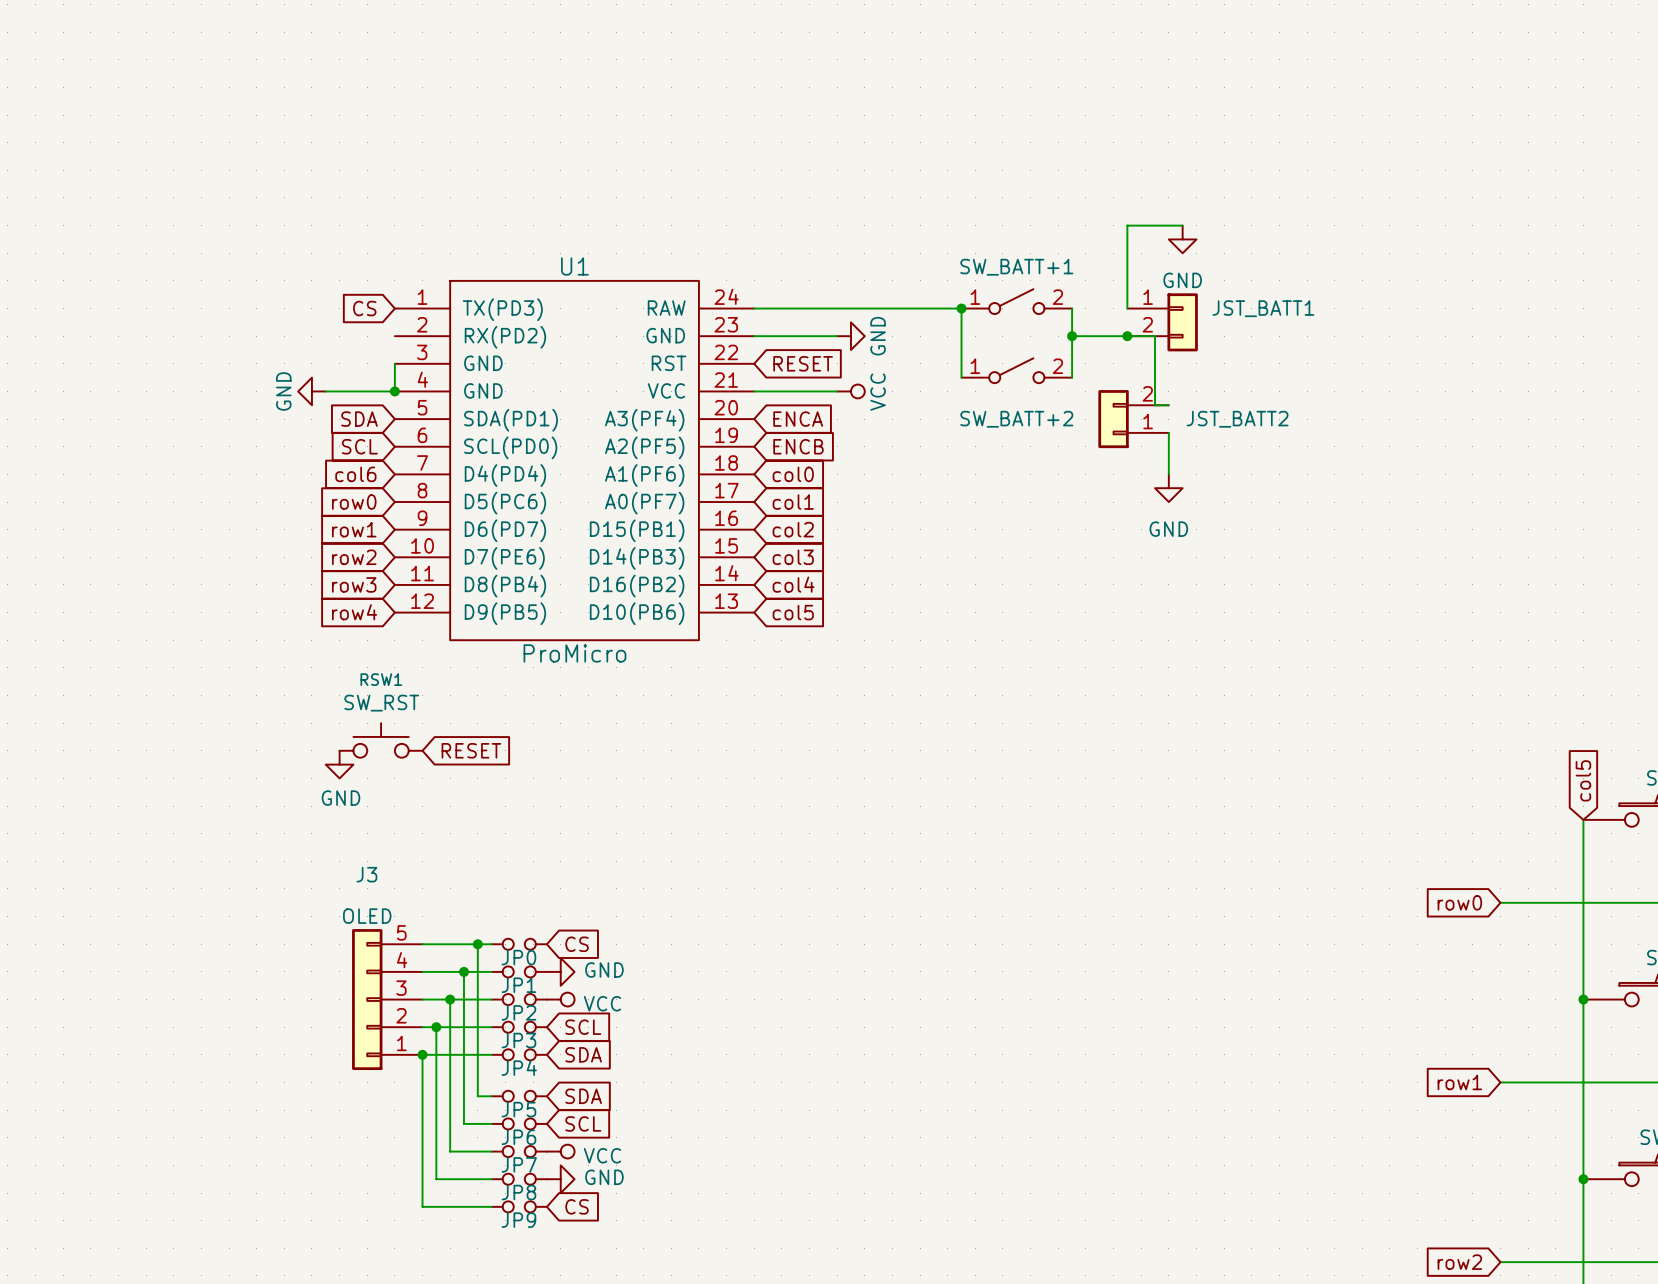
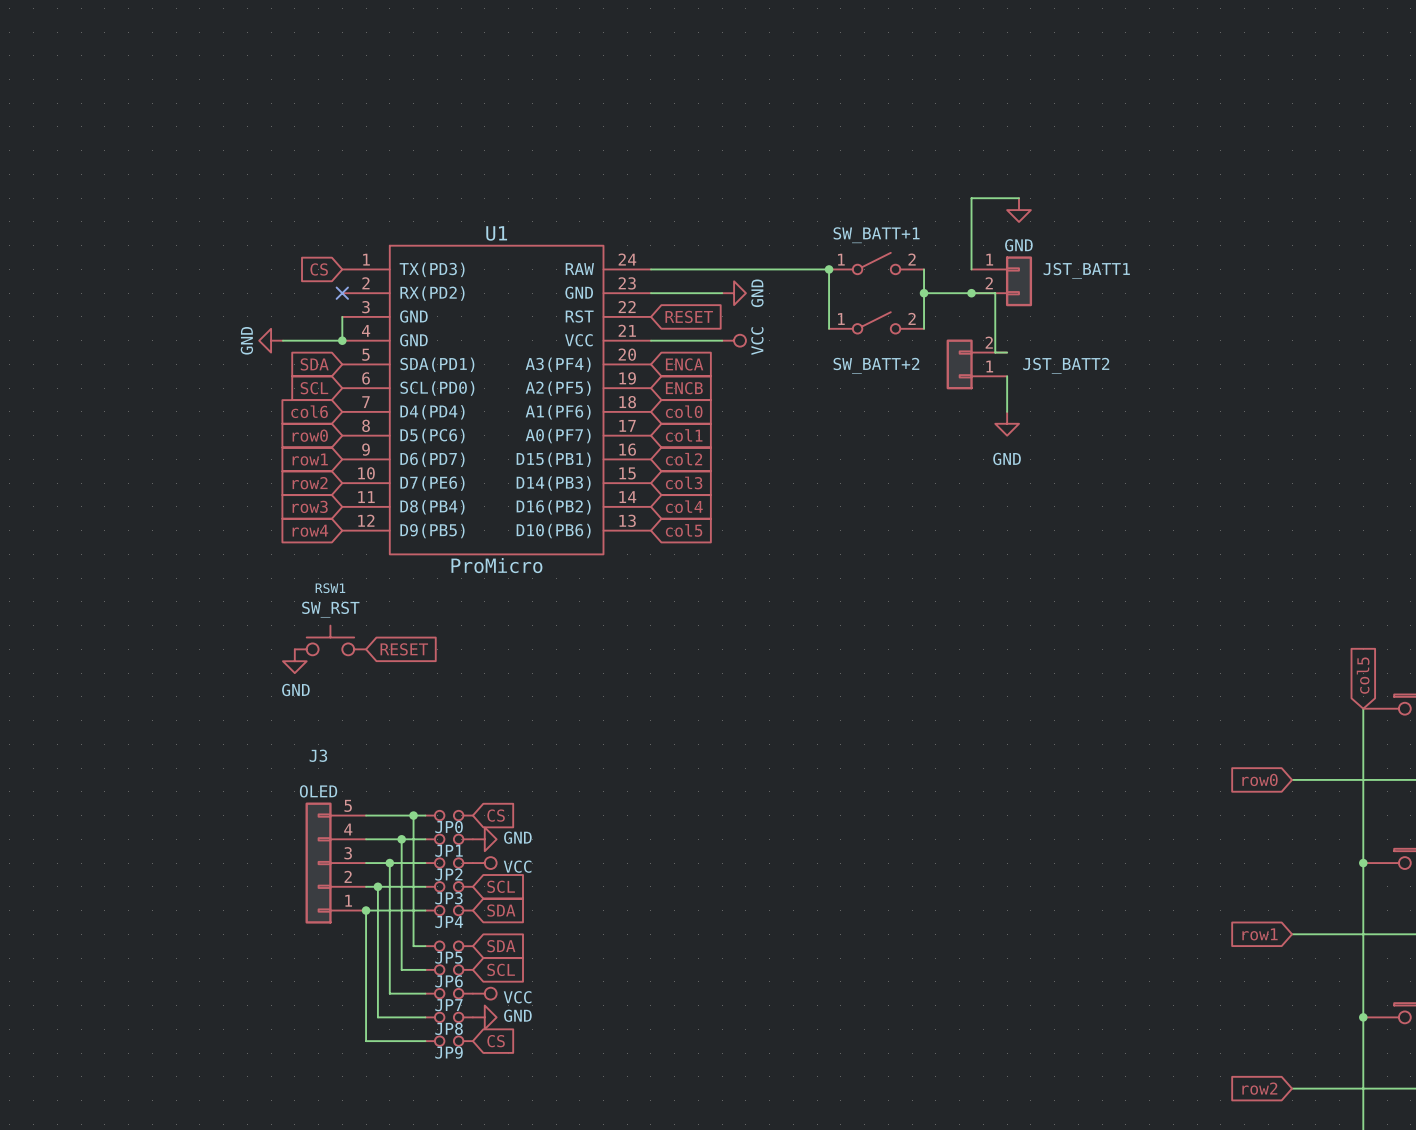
no-connect mark: none -> (342, 293)

